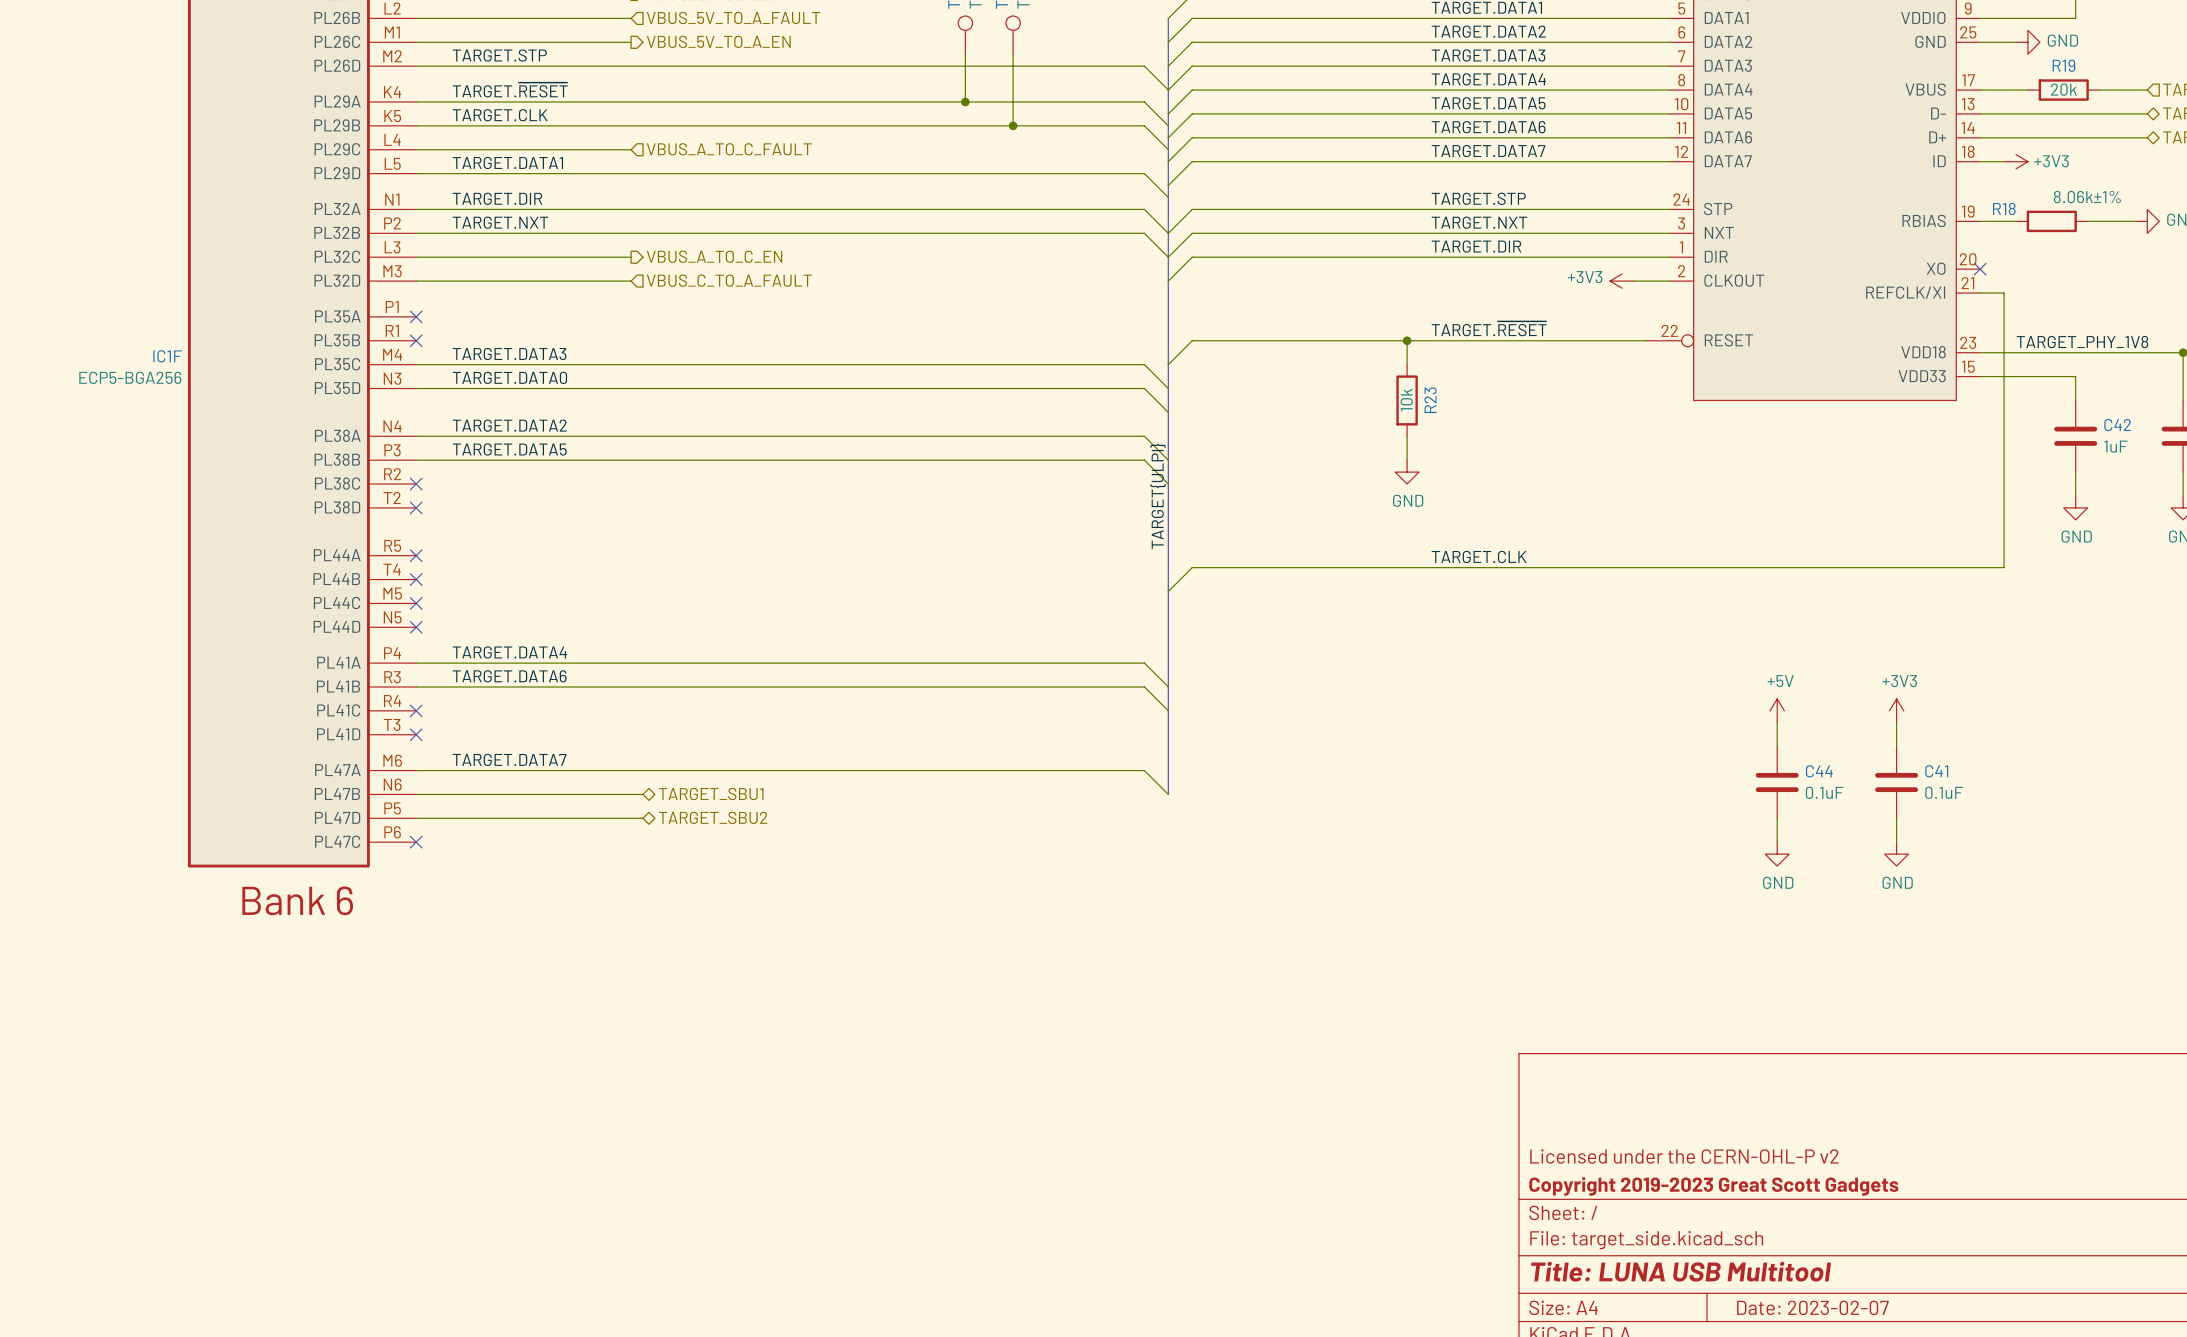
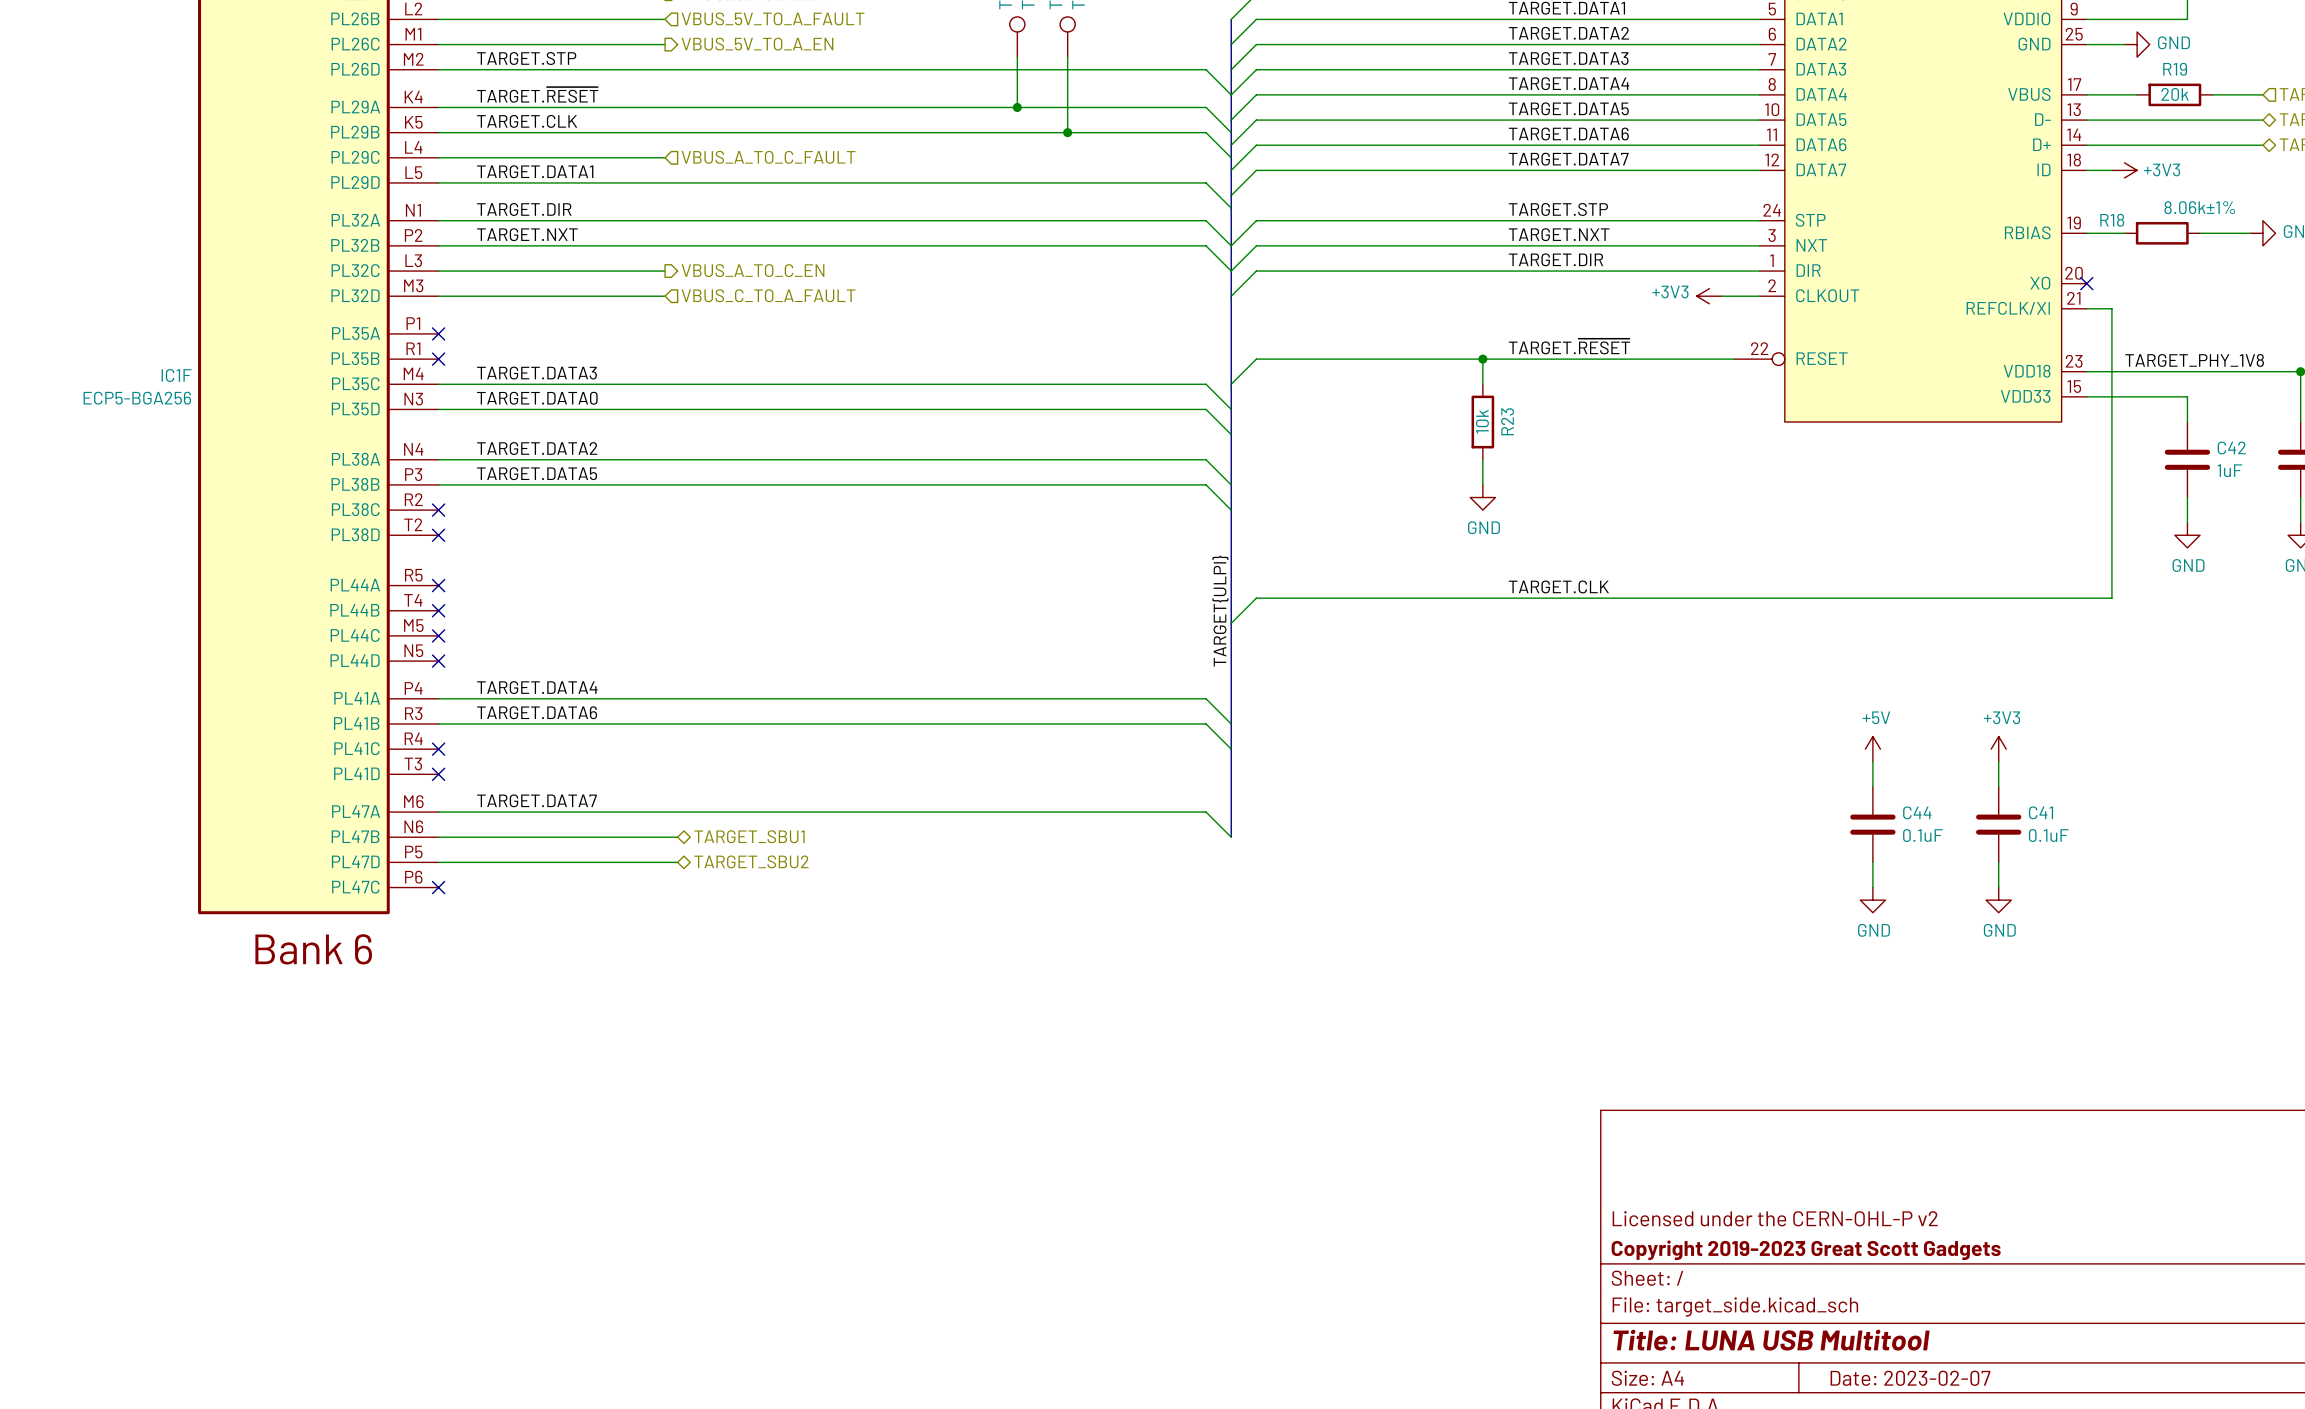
label position: TARGET{ULPI} (1158, 496) -> TARGET{ULPI} (1220, 611)

